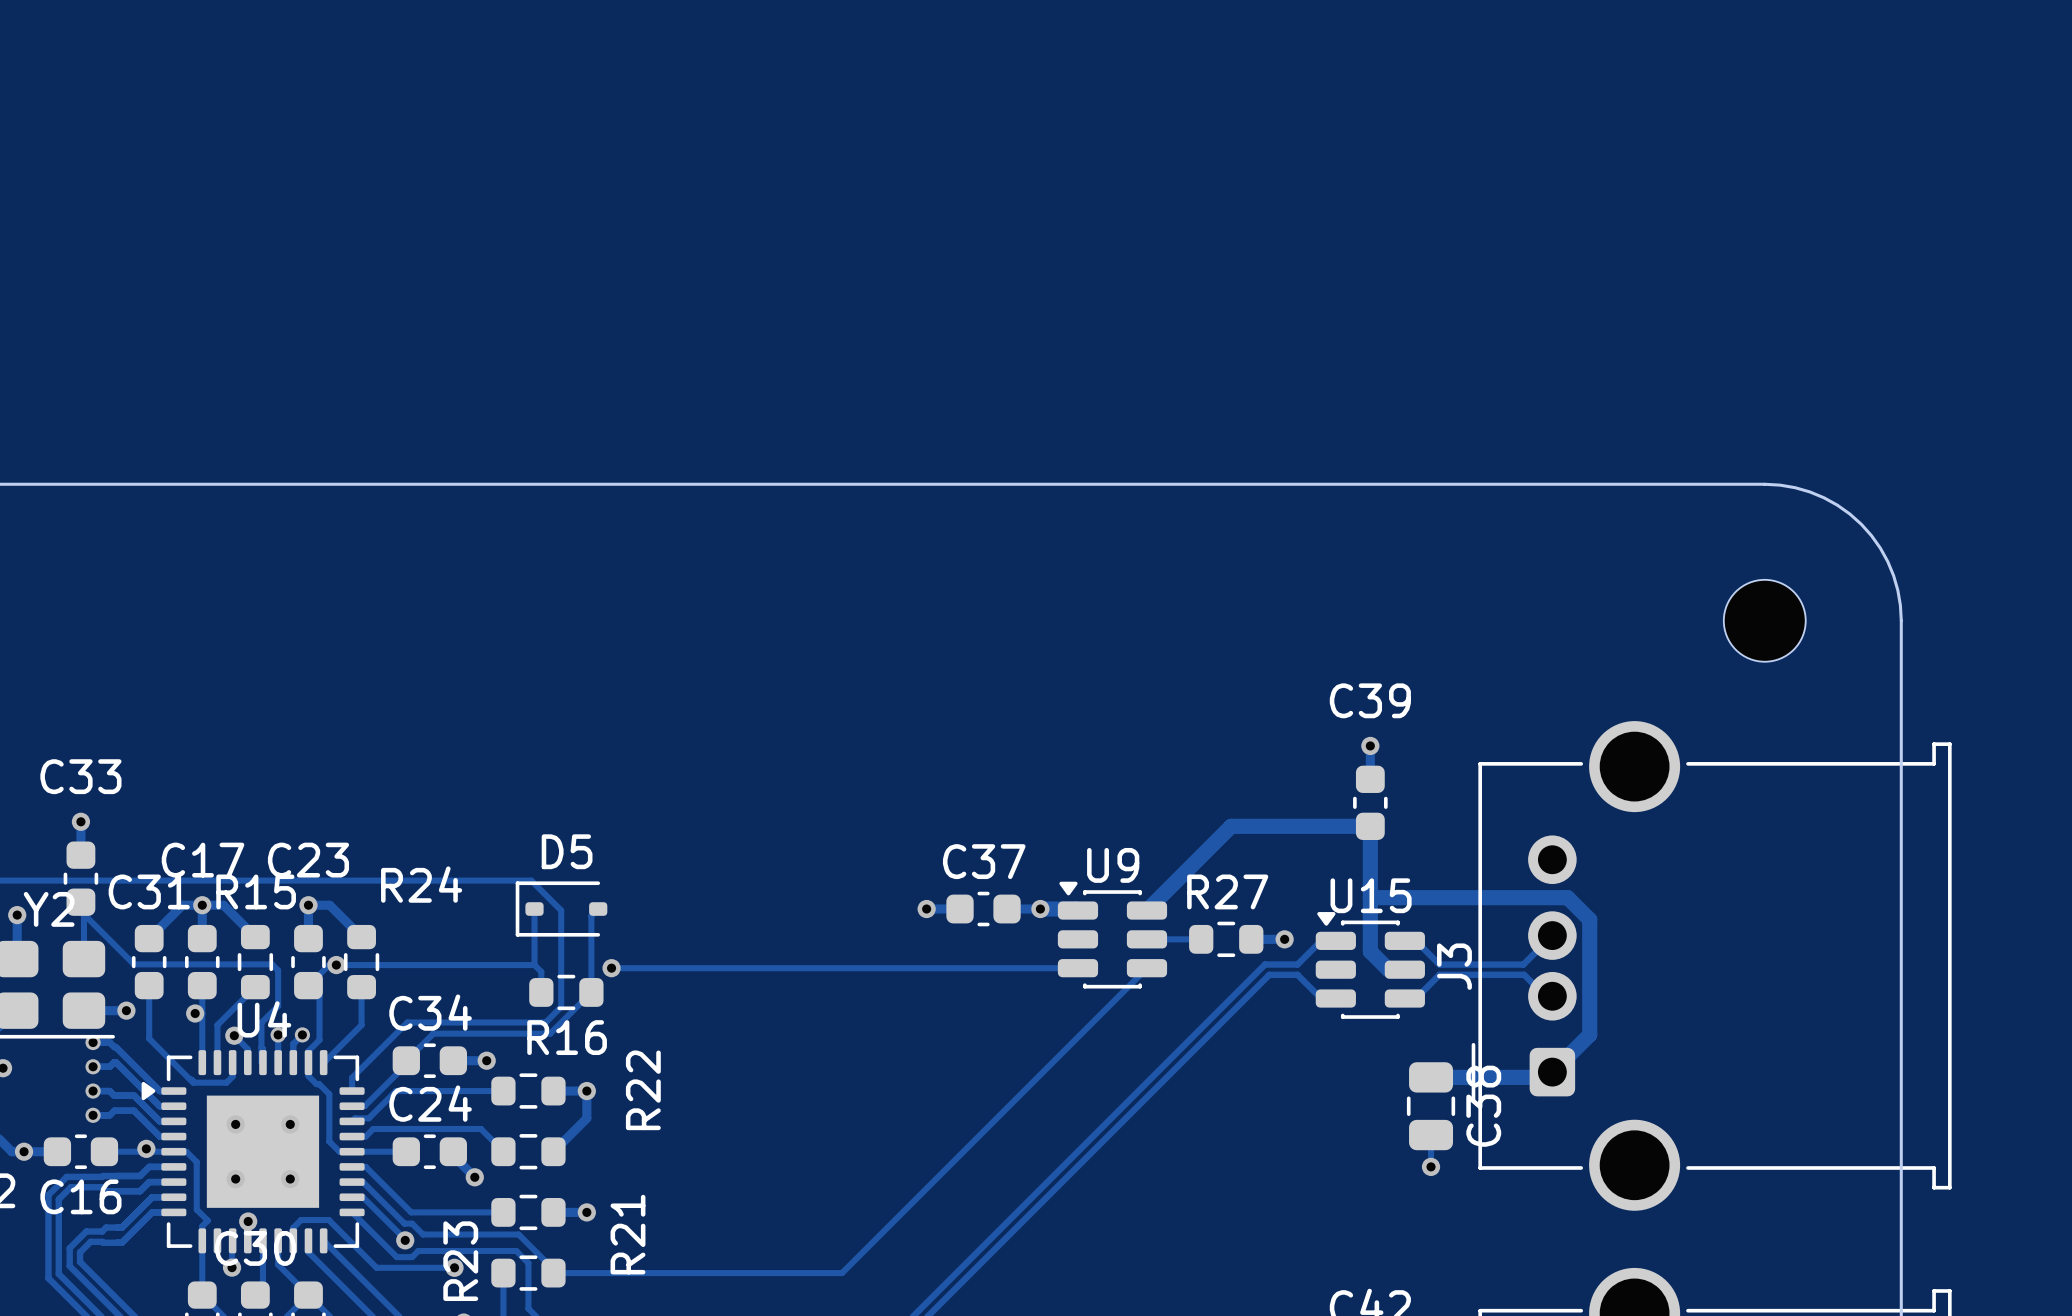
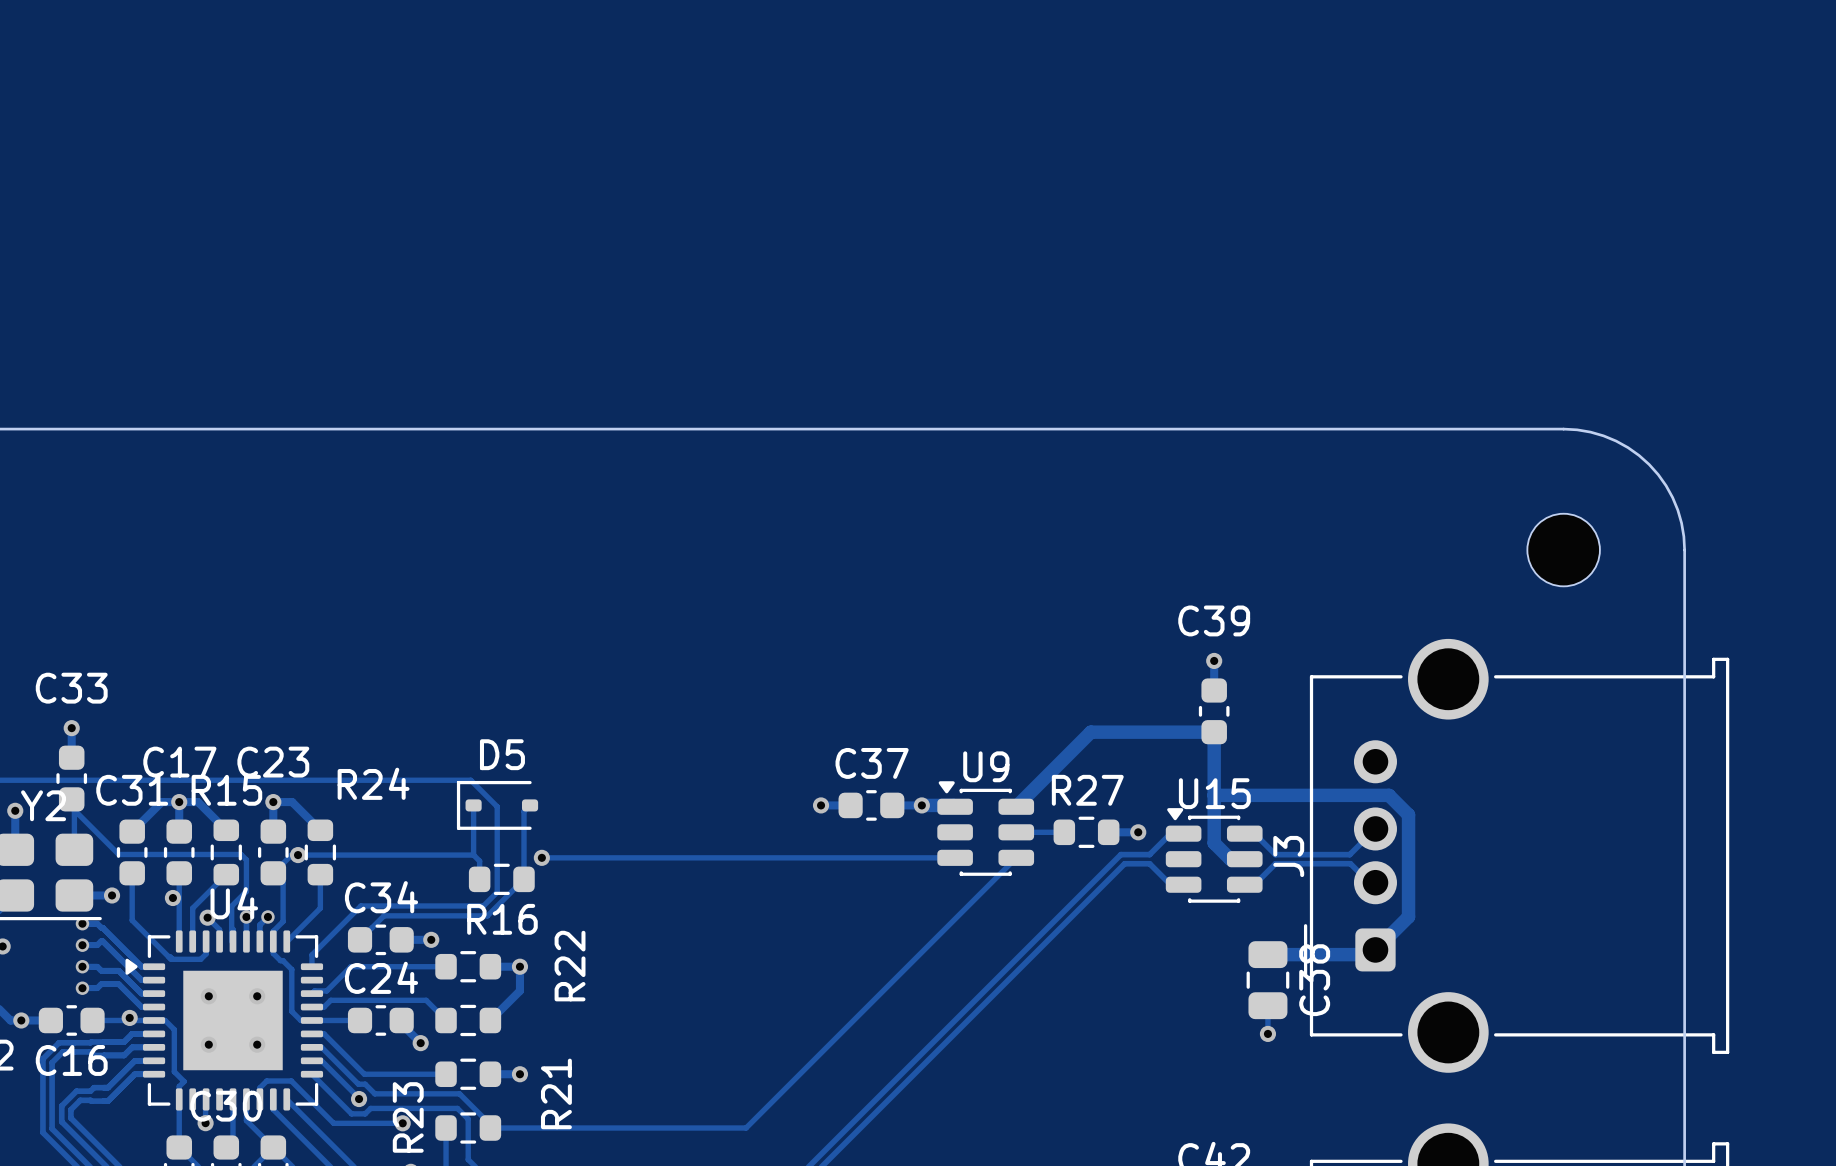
track: (406, 1060) (406, 1064) (364, 1106) (352, 1106) -> none
via: (248, 1221) -> none

